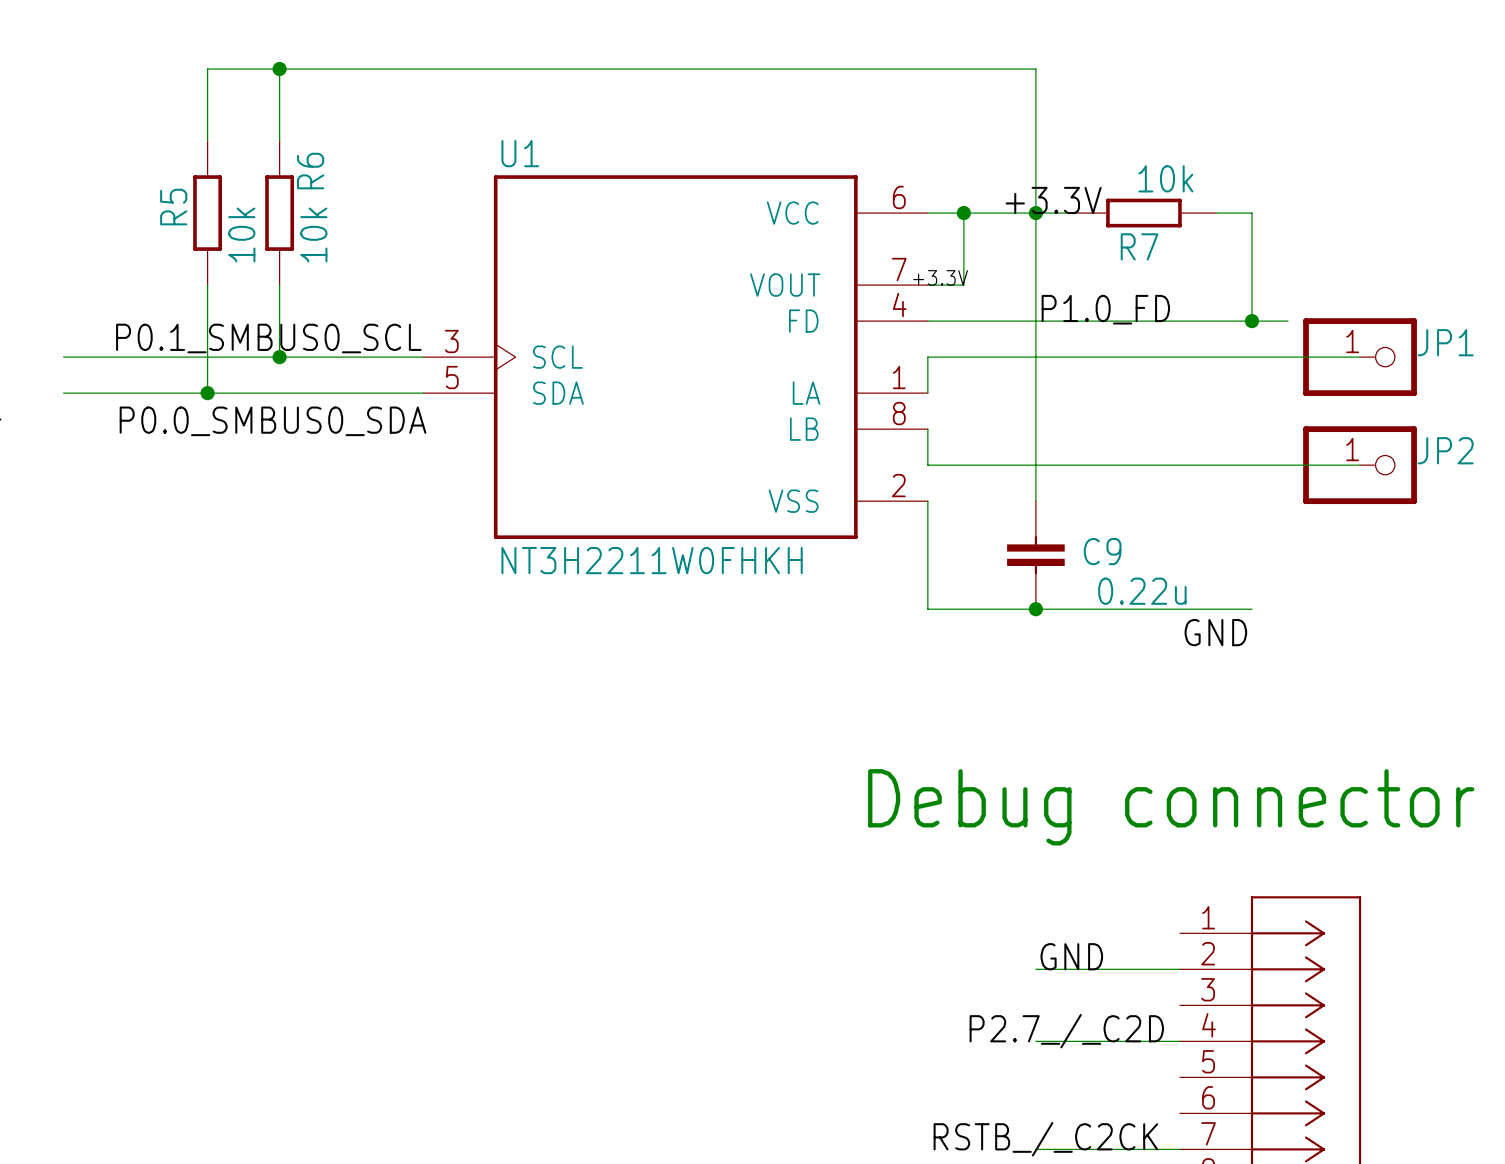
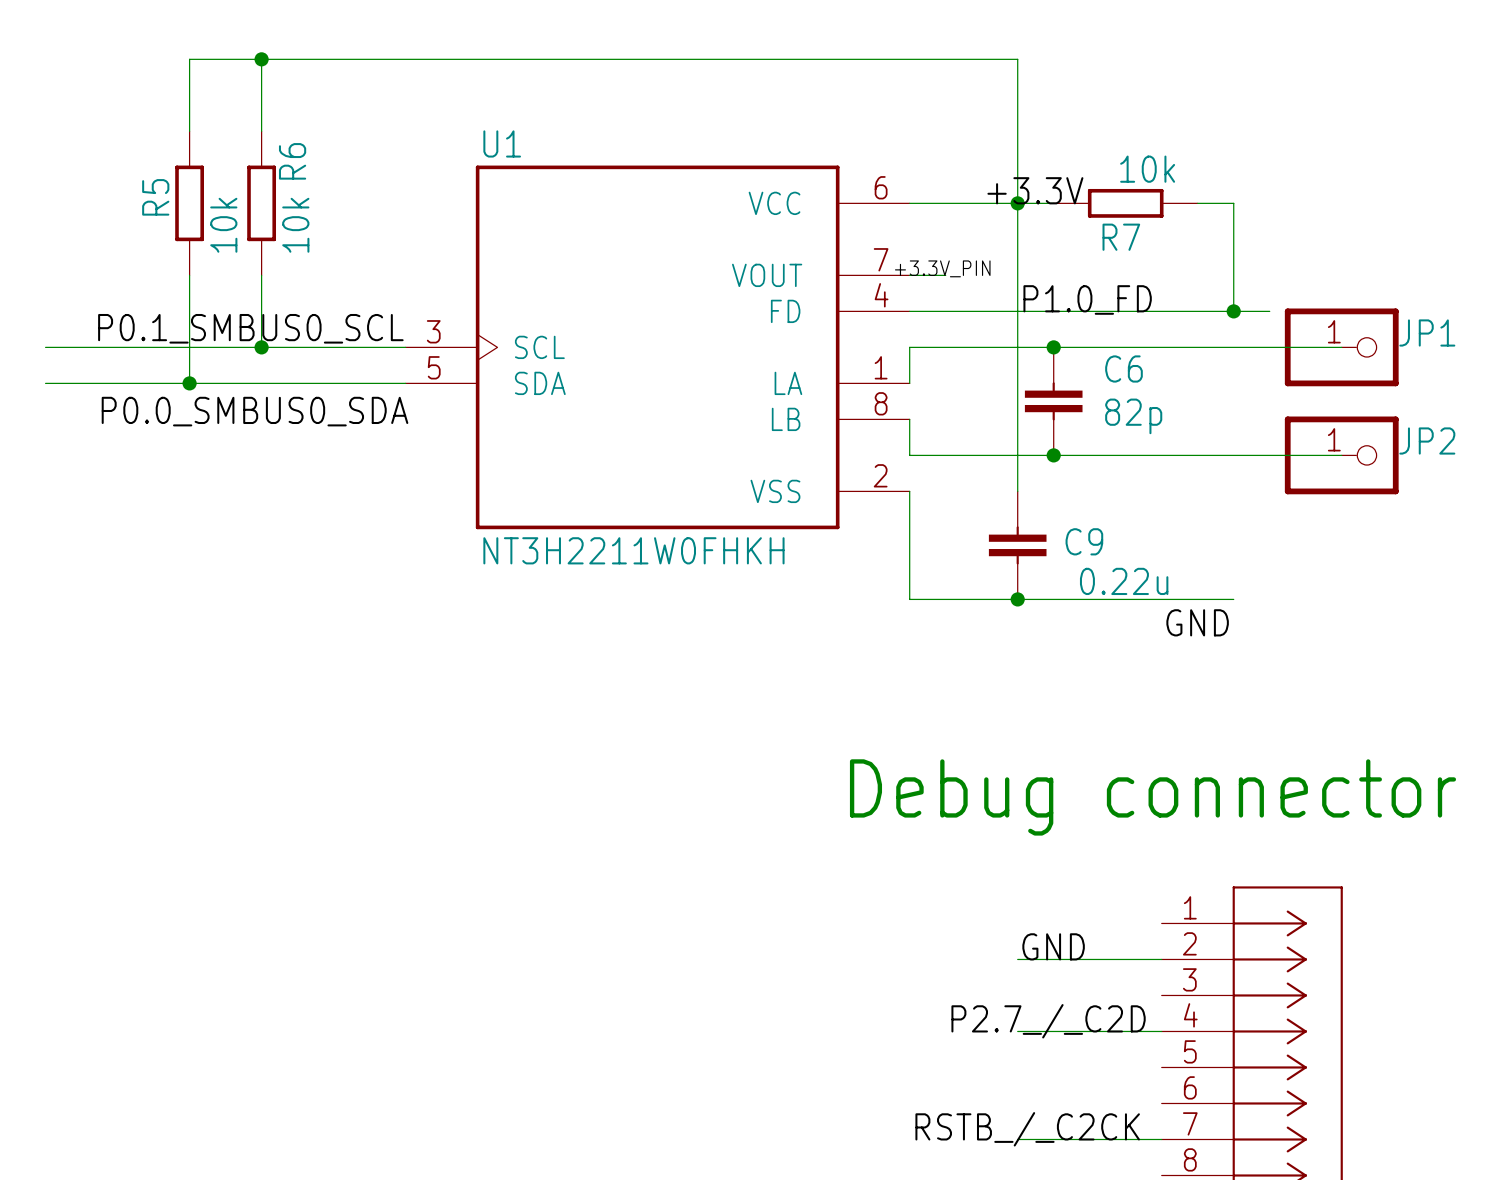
wire: (963, 213) (963, 285) -> none
junction: (963, 213) -> none
label: +3.3V (940, 277) -> +3.3V_PIN (942, 268)
junction: none -> (1053, 347)
C6: none -> 82p (1053, 401)
junction: none -> (1053, 455)

